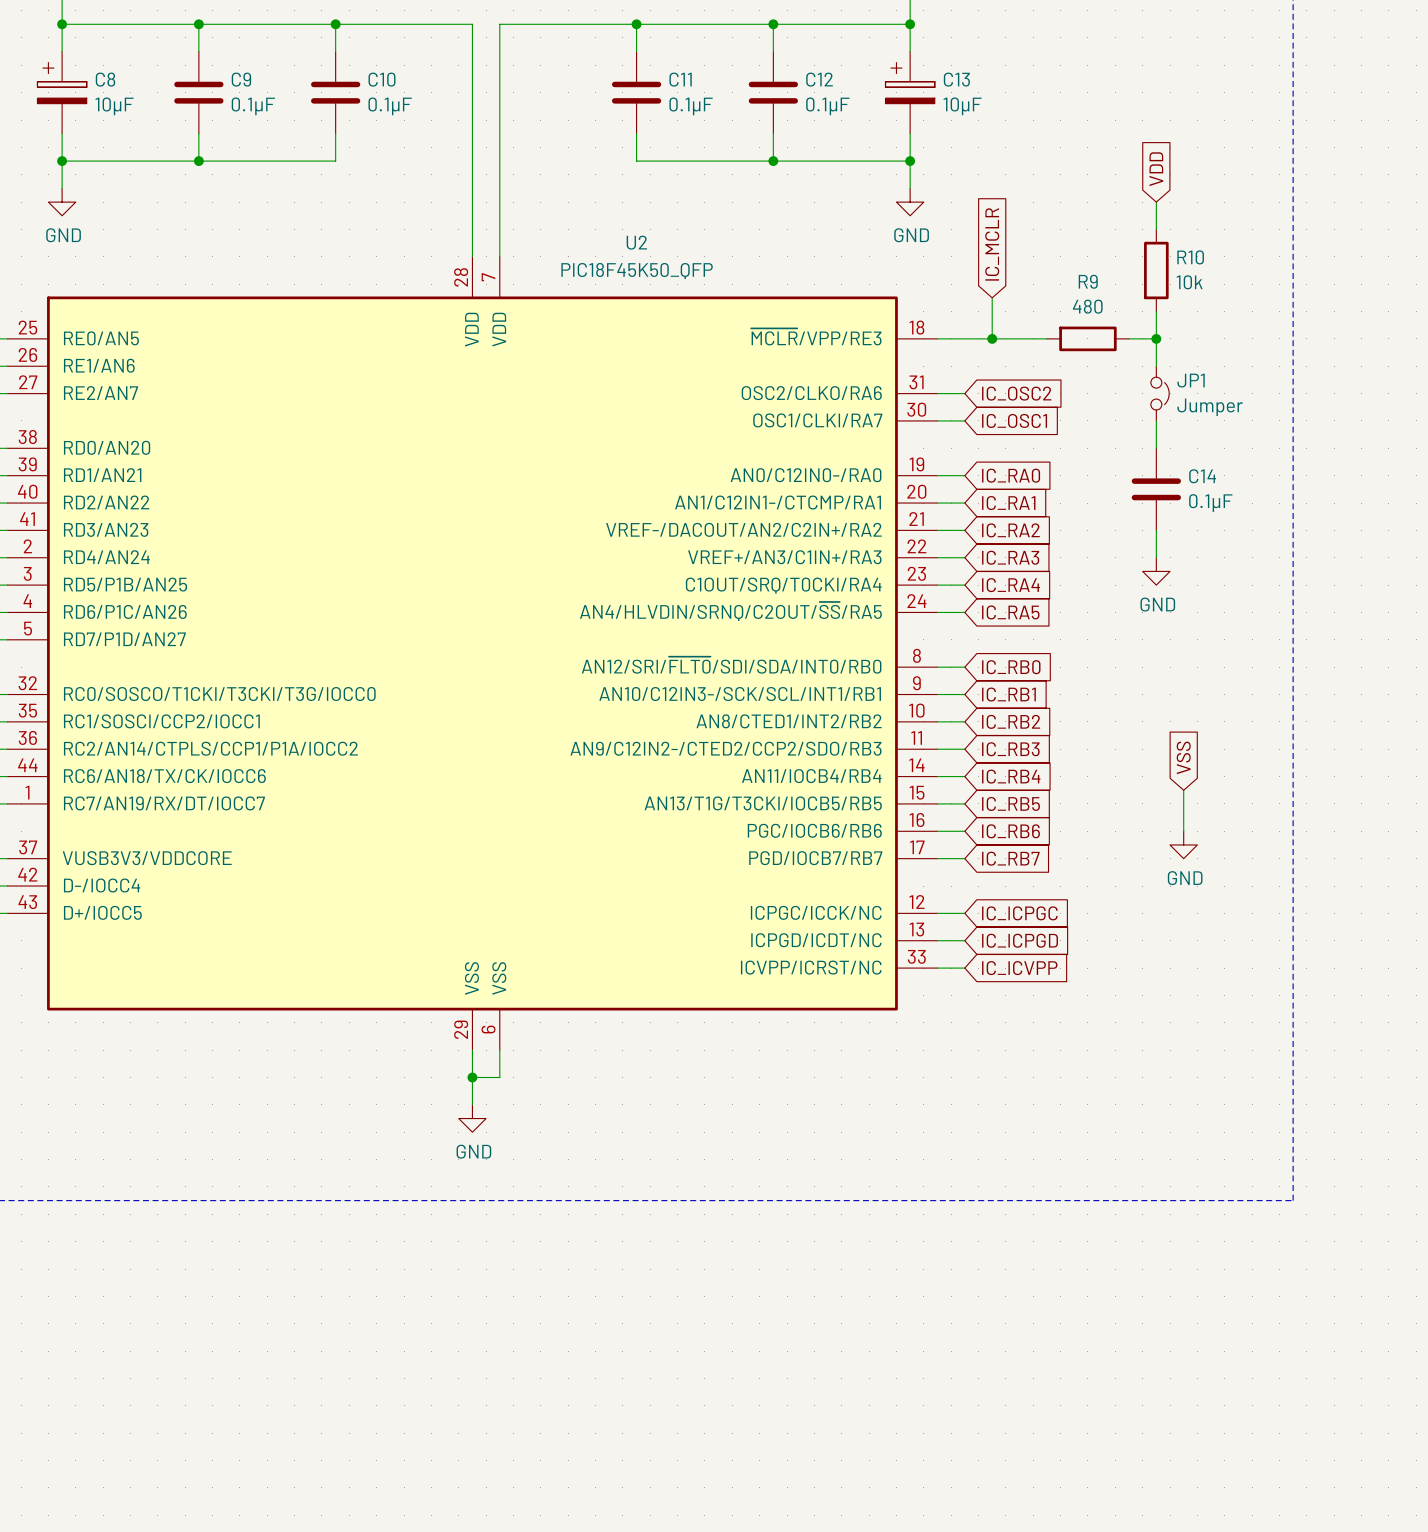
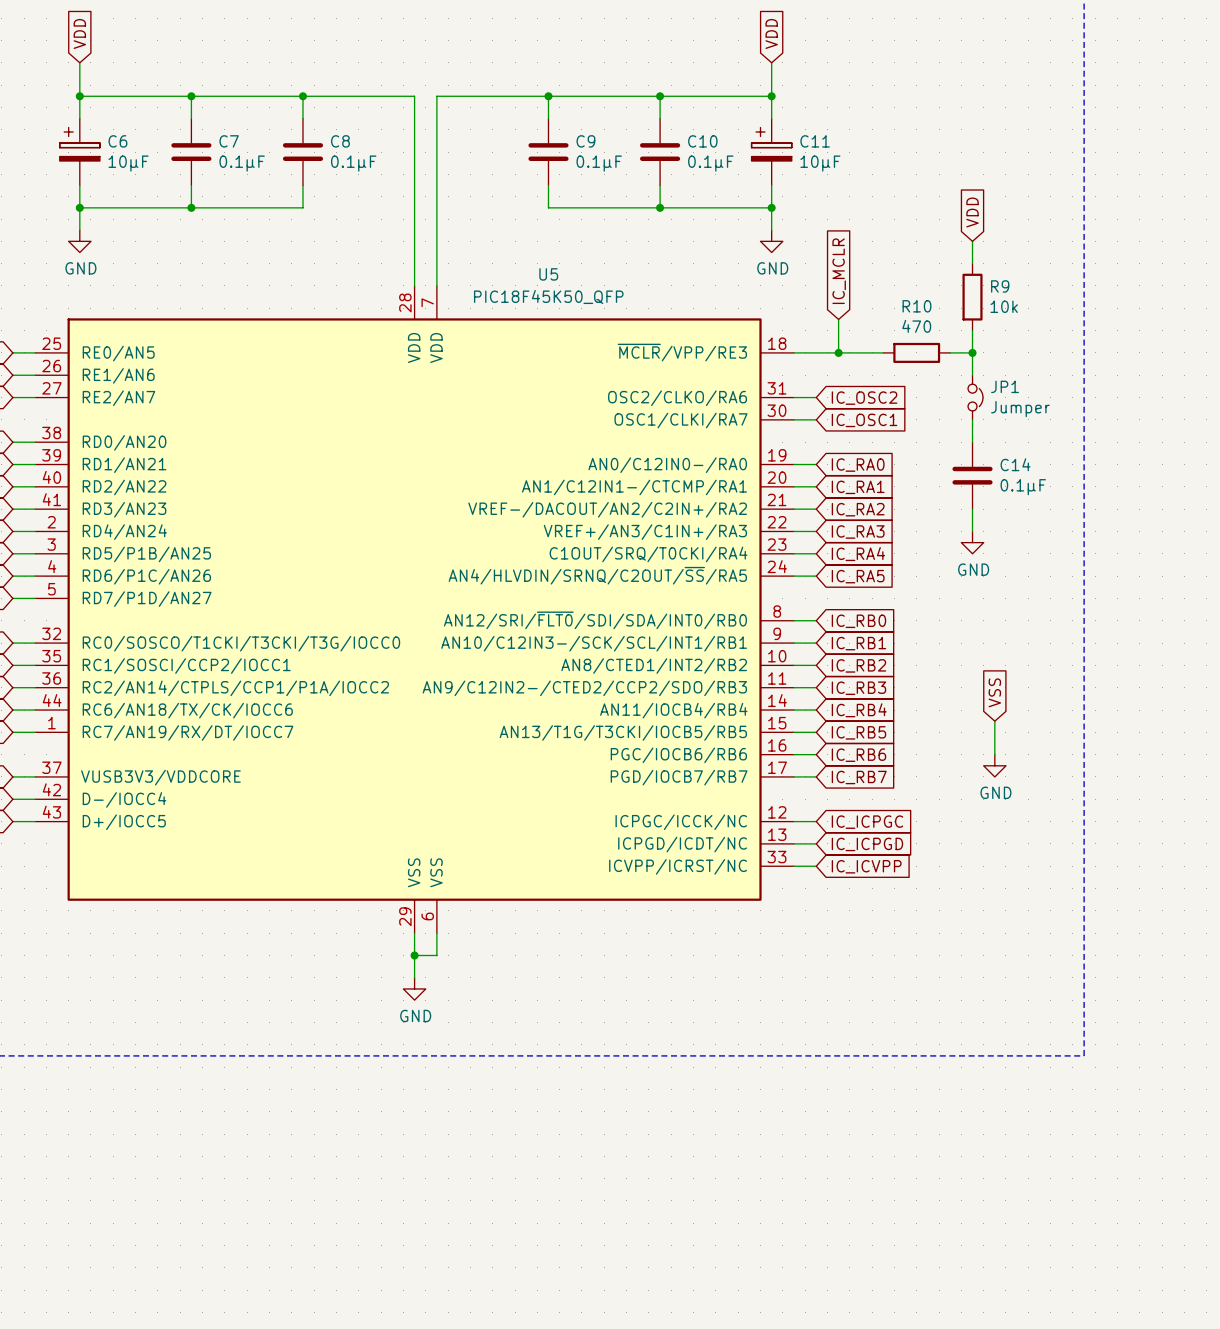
C8 name: C8 (105, 79) -> C6 (117, 141)
C9 name: C9 (241, 79) -> C7 (229, 141)
C10 name: C10 (381, 79) -> C8 (340, 141)
C11 name: C11 (680, 79) -> C9 (585, 141)
C12 name: C12 (819, 79) -> C10 (702, 141)
C13 name: C13 (956, 79) -> C11 (815, 141)
U2 name: U2 (636, 242) -> U5 (548, 274)
R10 name: R10 (1190, 257) -> R9 (1000, 286)
R9 name: R9 (1088, 281) -> R10 (916, 306)
R9 value: 480 (1087, 306) -> 470 (916, 326)

